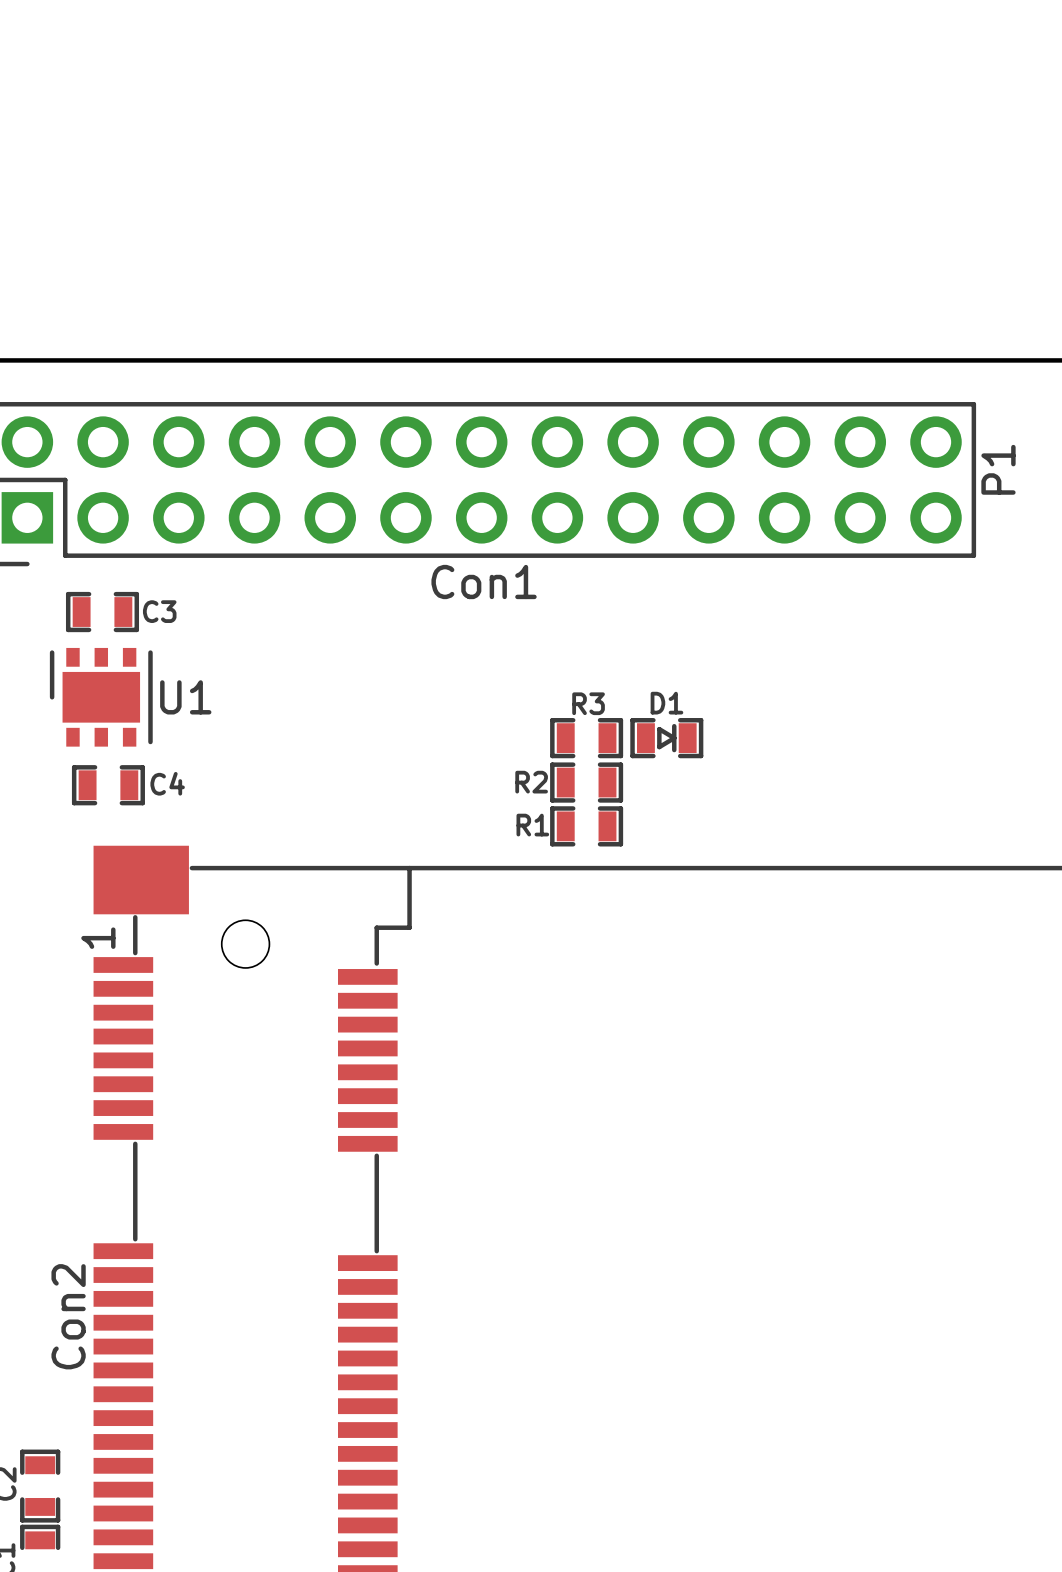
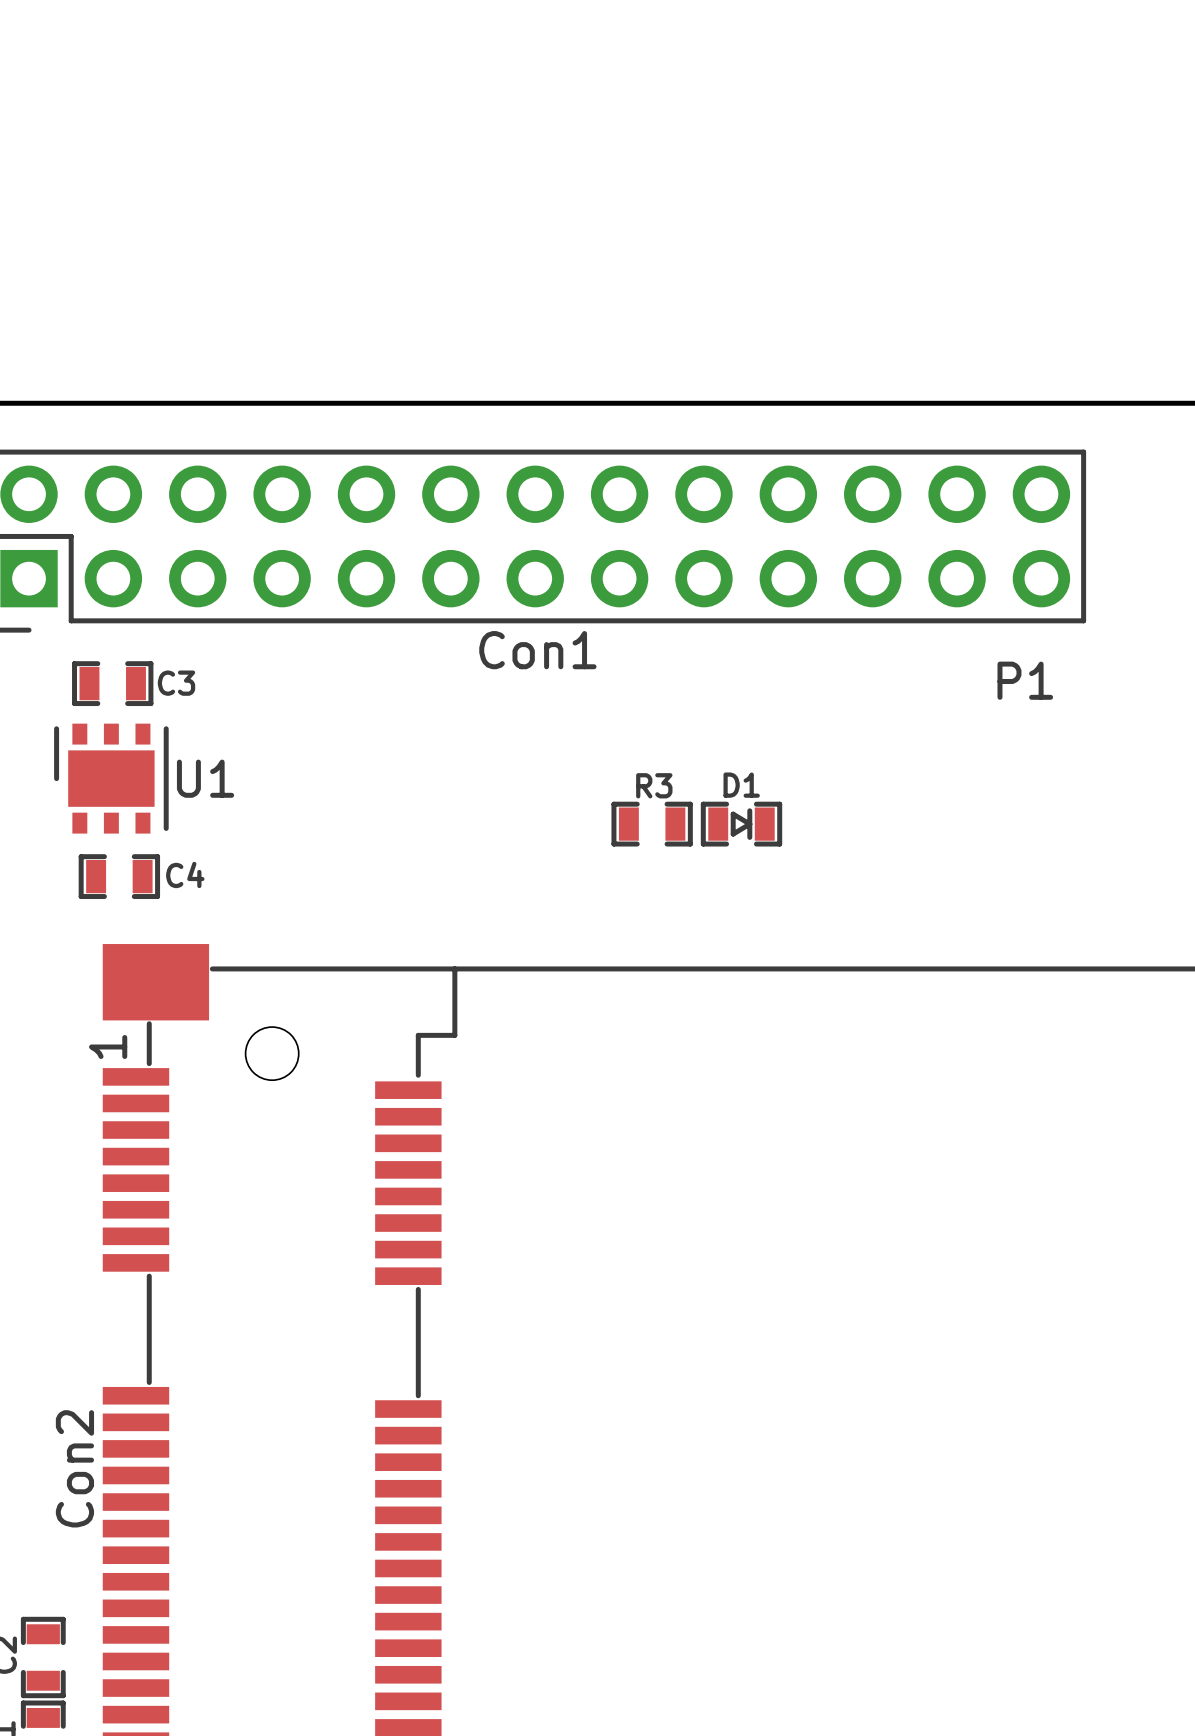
Con1 text rotation: 0° (998, 469) -> 90° clockwise (1025, 680)
Con1 text position: P1 (998, 469) -> P1 (1025, 680)
R2: (586, 782) -> none
R1: (586, 826) -> none

